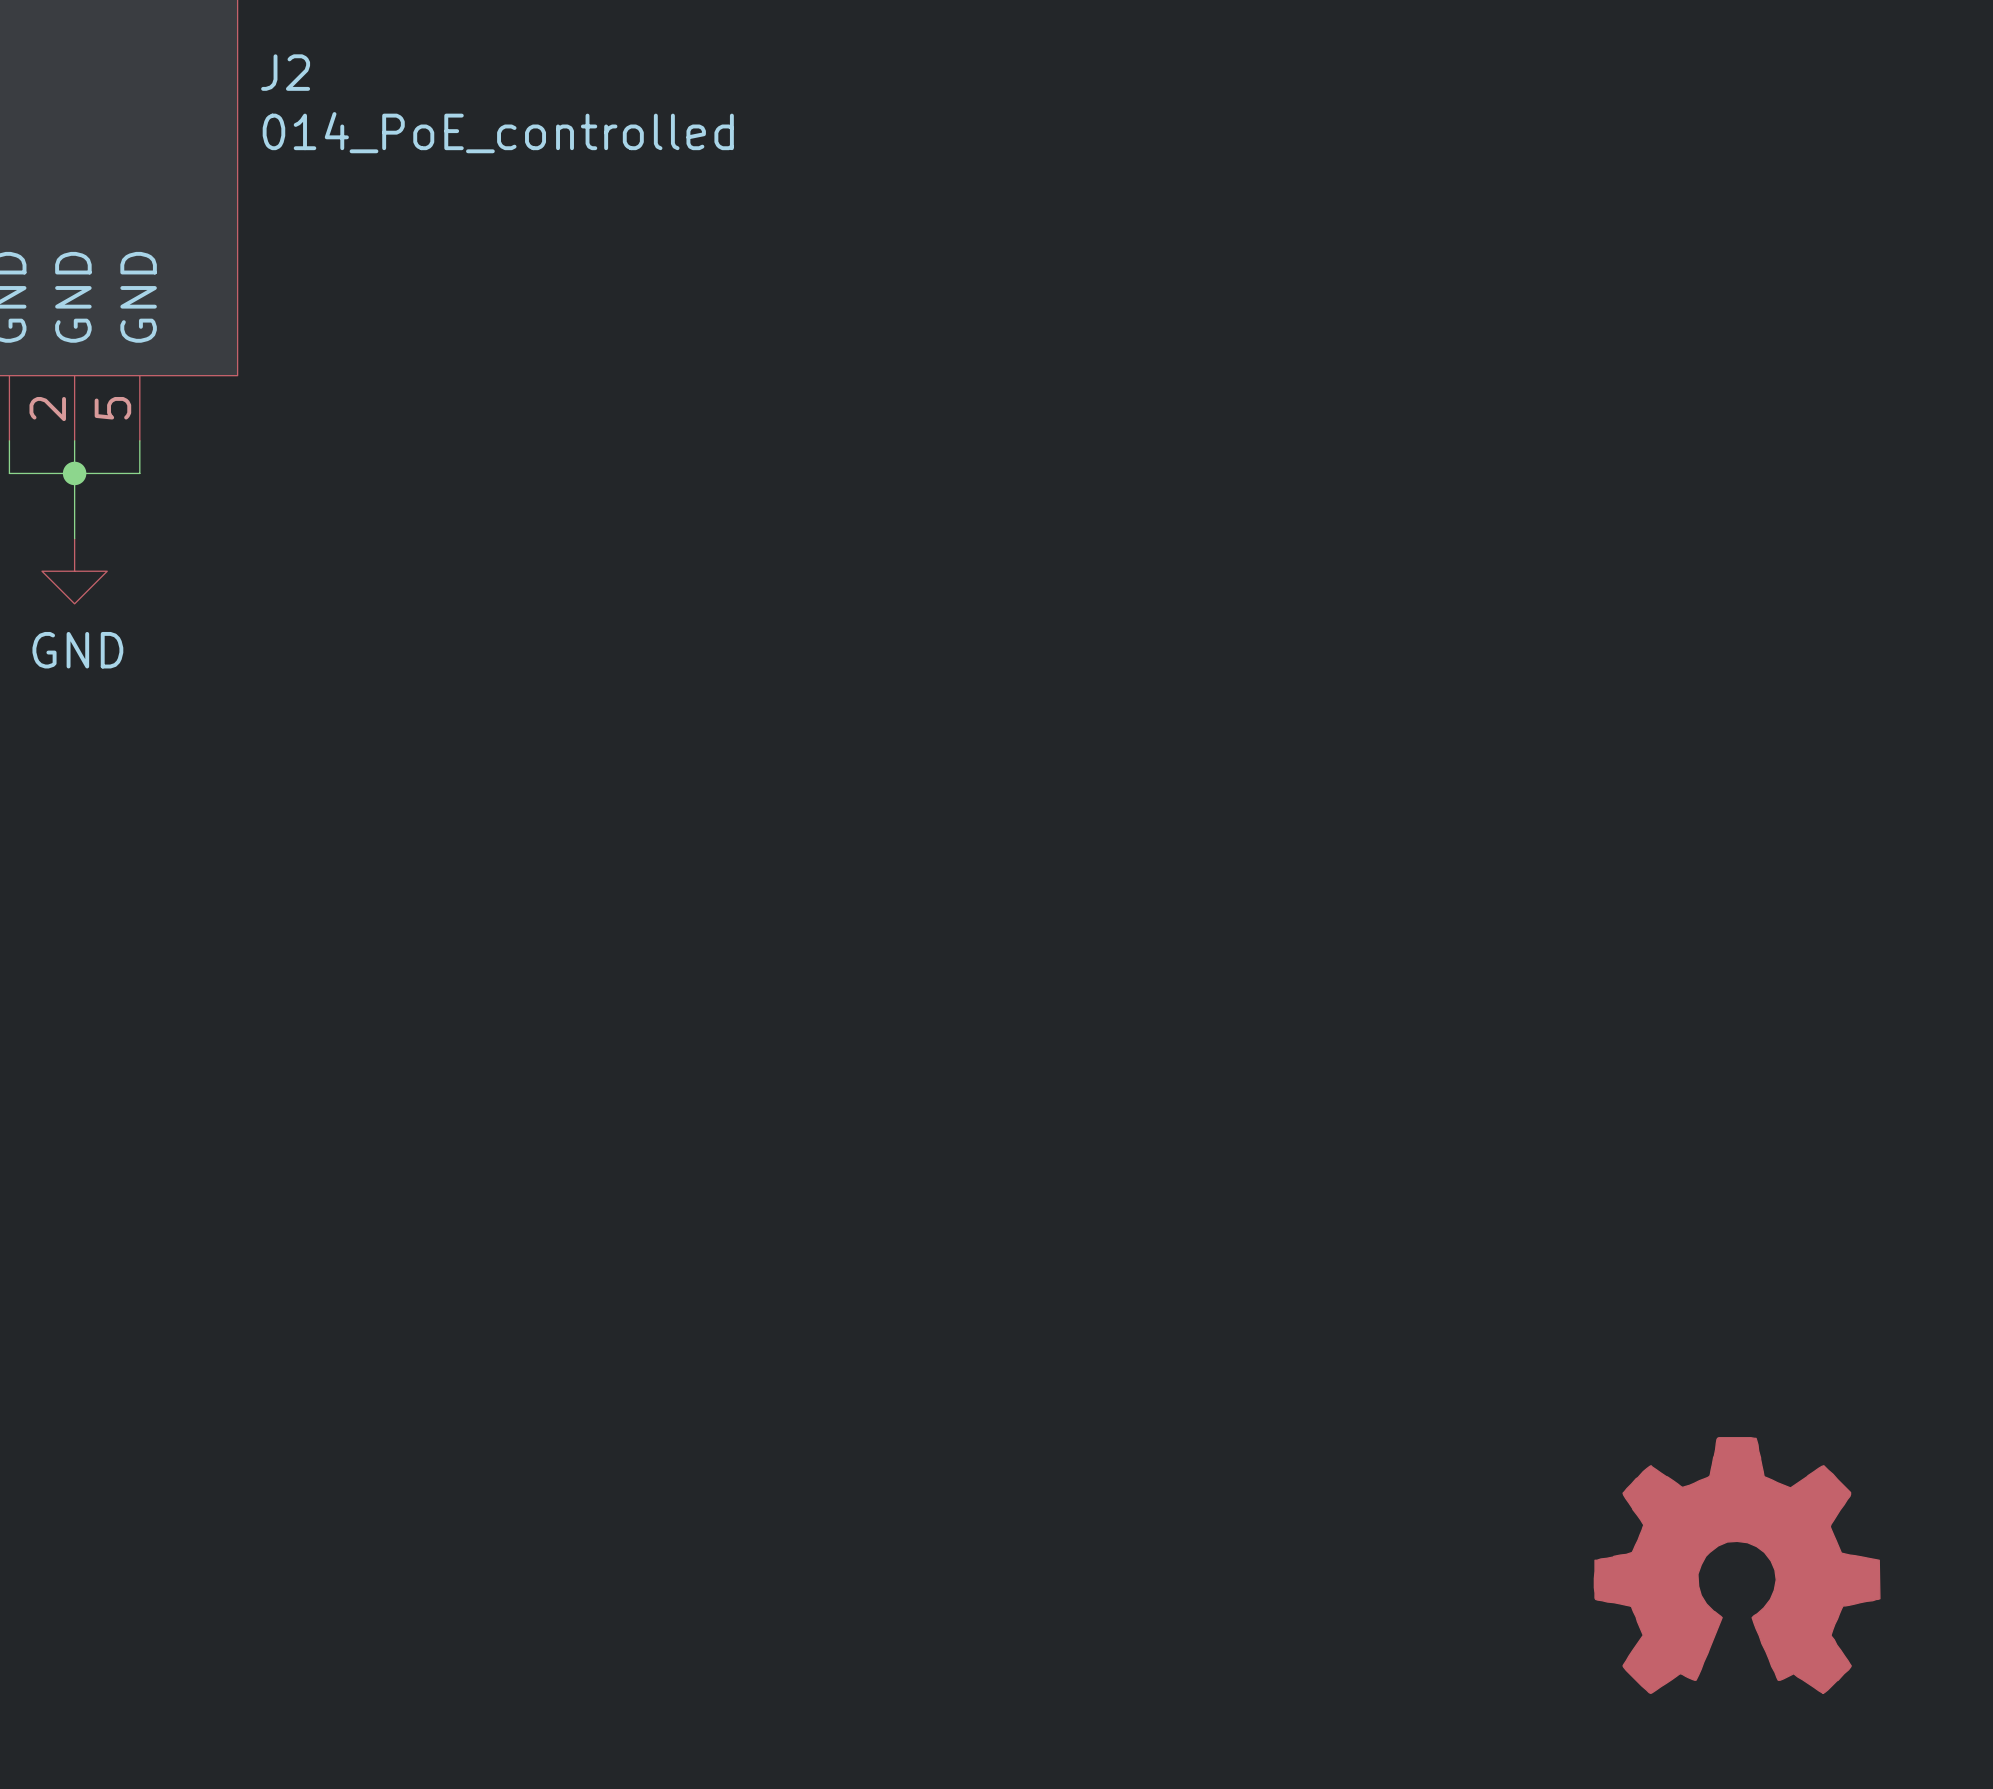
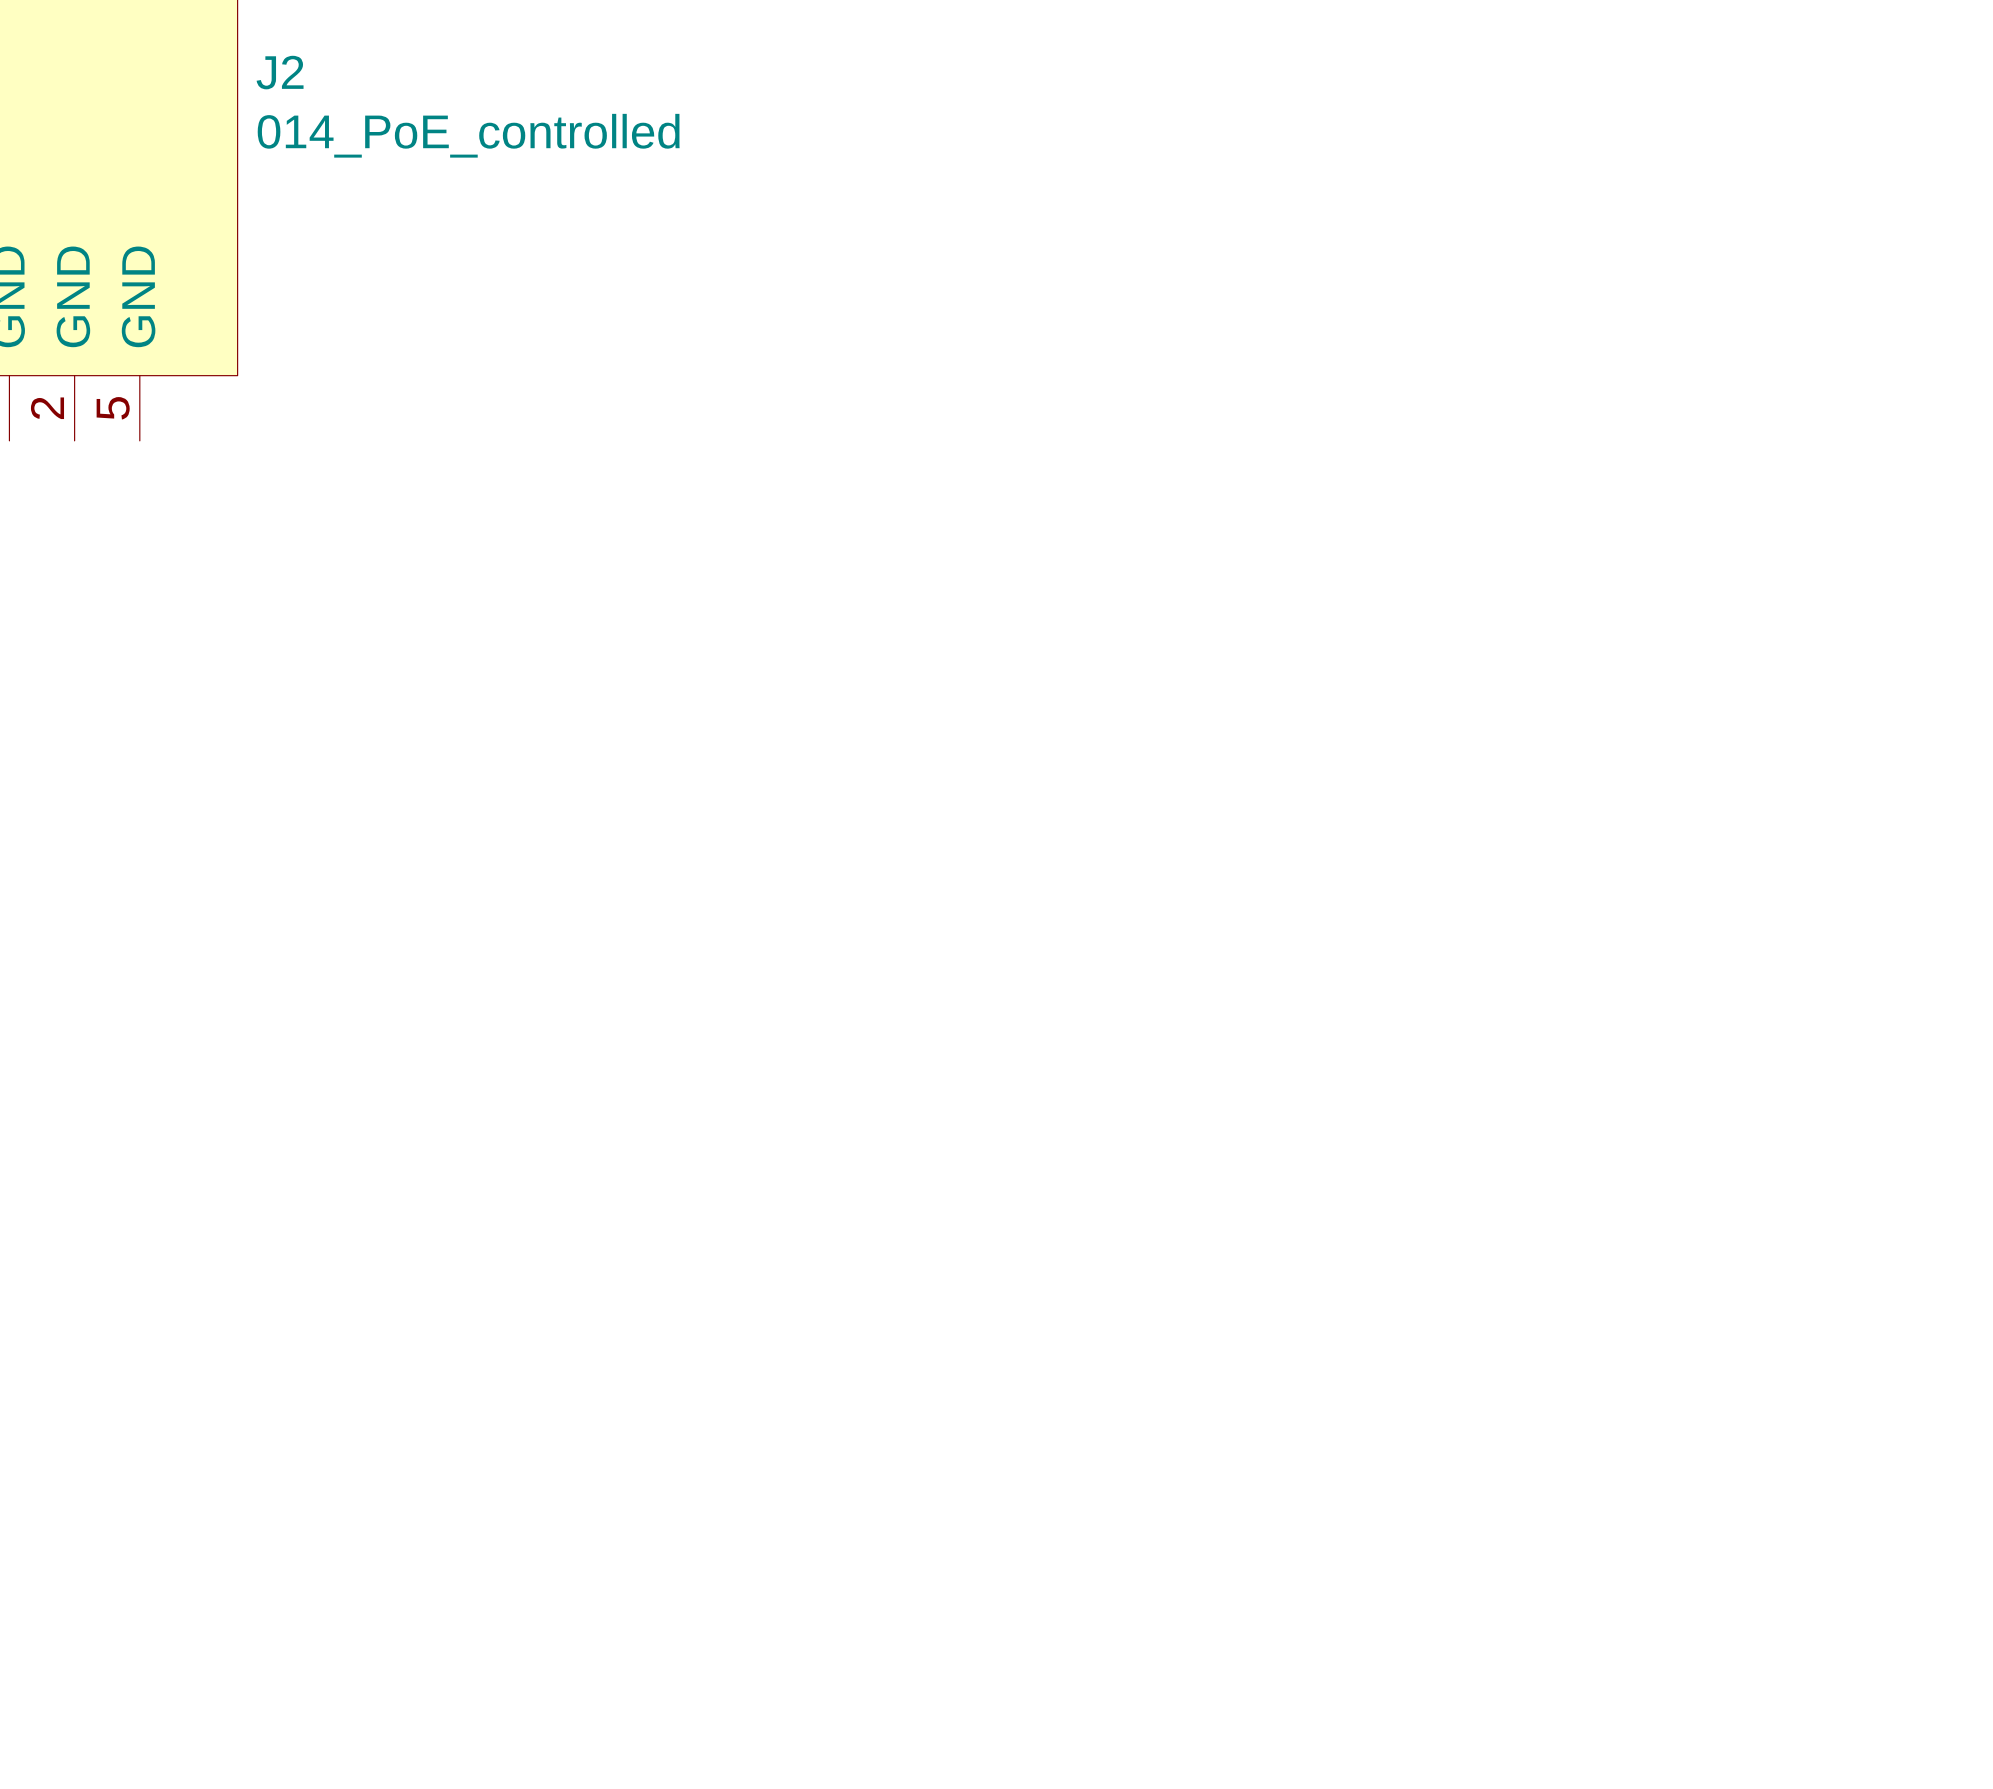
wire: (9, 440) (9, 473) (139, 473) (139, 440) -> none
wire: (74, 440) (74, 538) -> none
junction: (74, 473) -> none
power symbol: GND (74, 571) -> none
part: (1737, 1565) -> none

